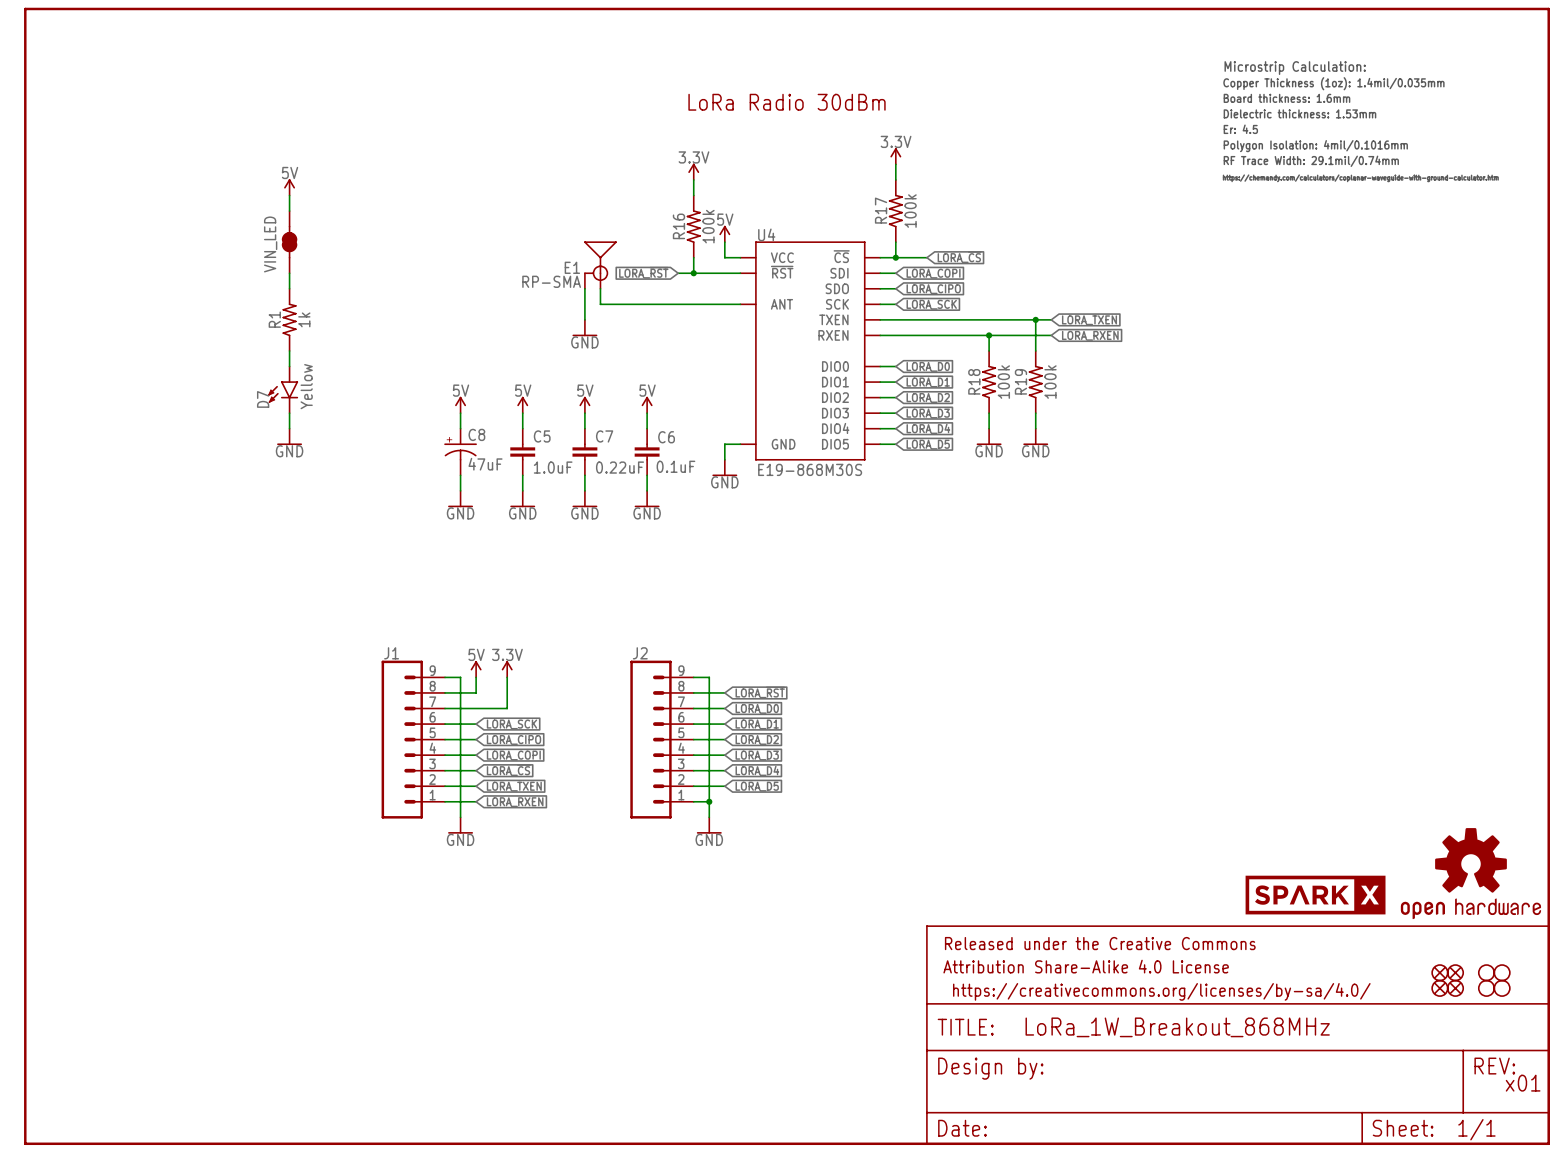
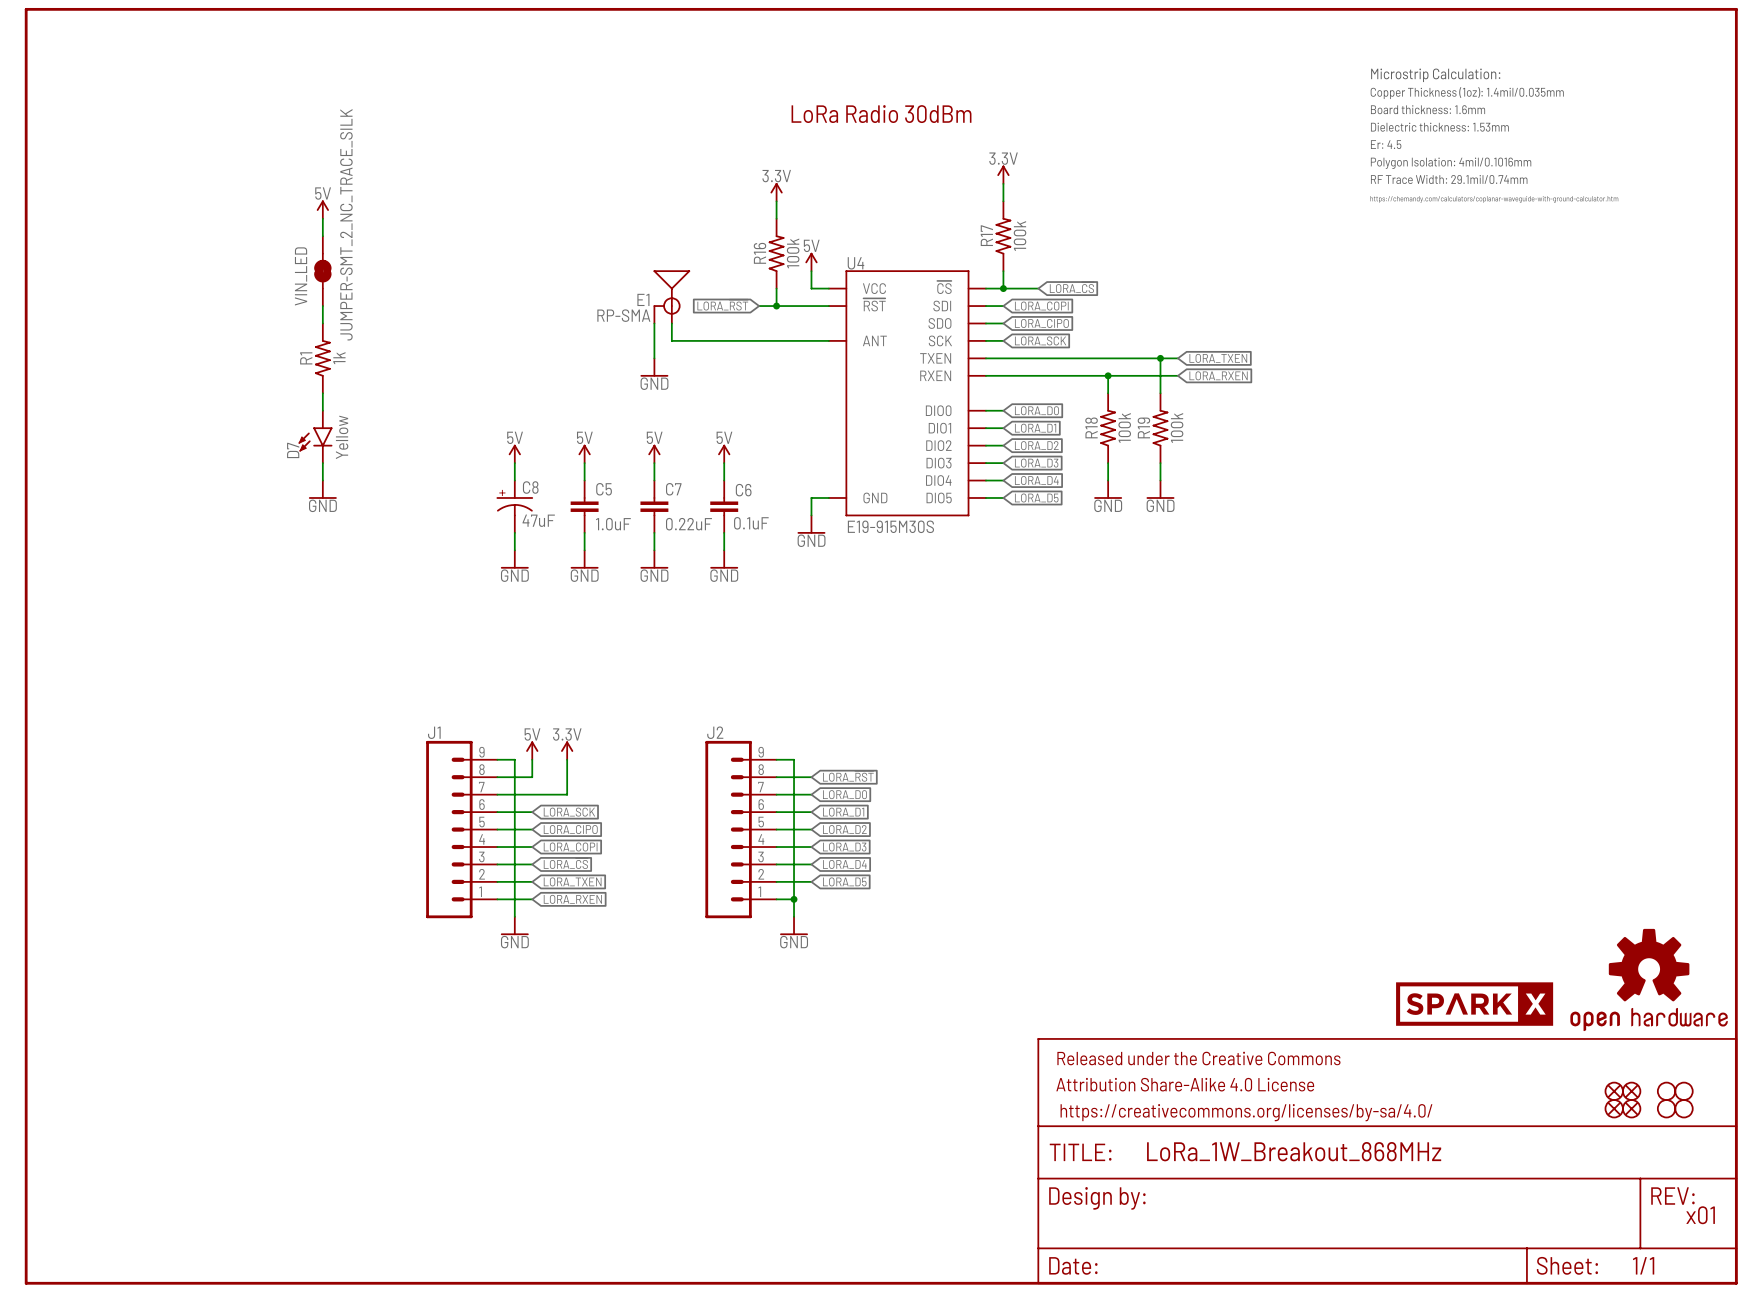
VIN_LED value: none -> JUMPER-SMT_2_NC_TRACE_SILK (346, 224)
U4 value: E19-868M30S (810, 469) -> E19-915M30S (890, 526)

